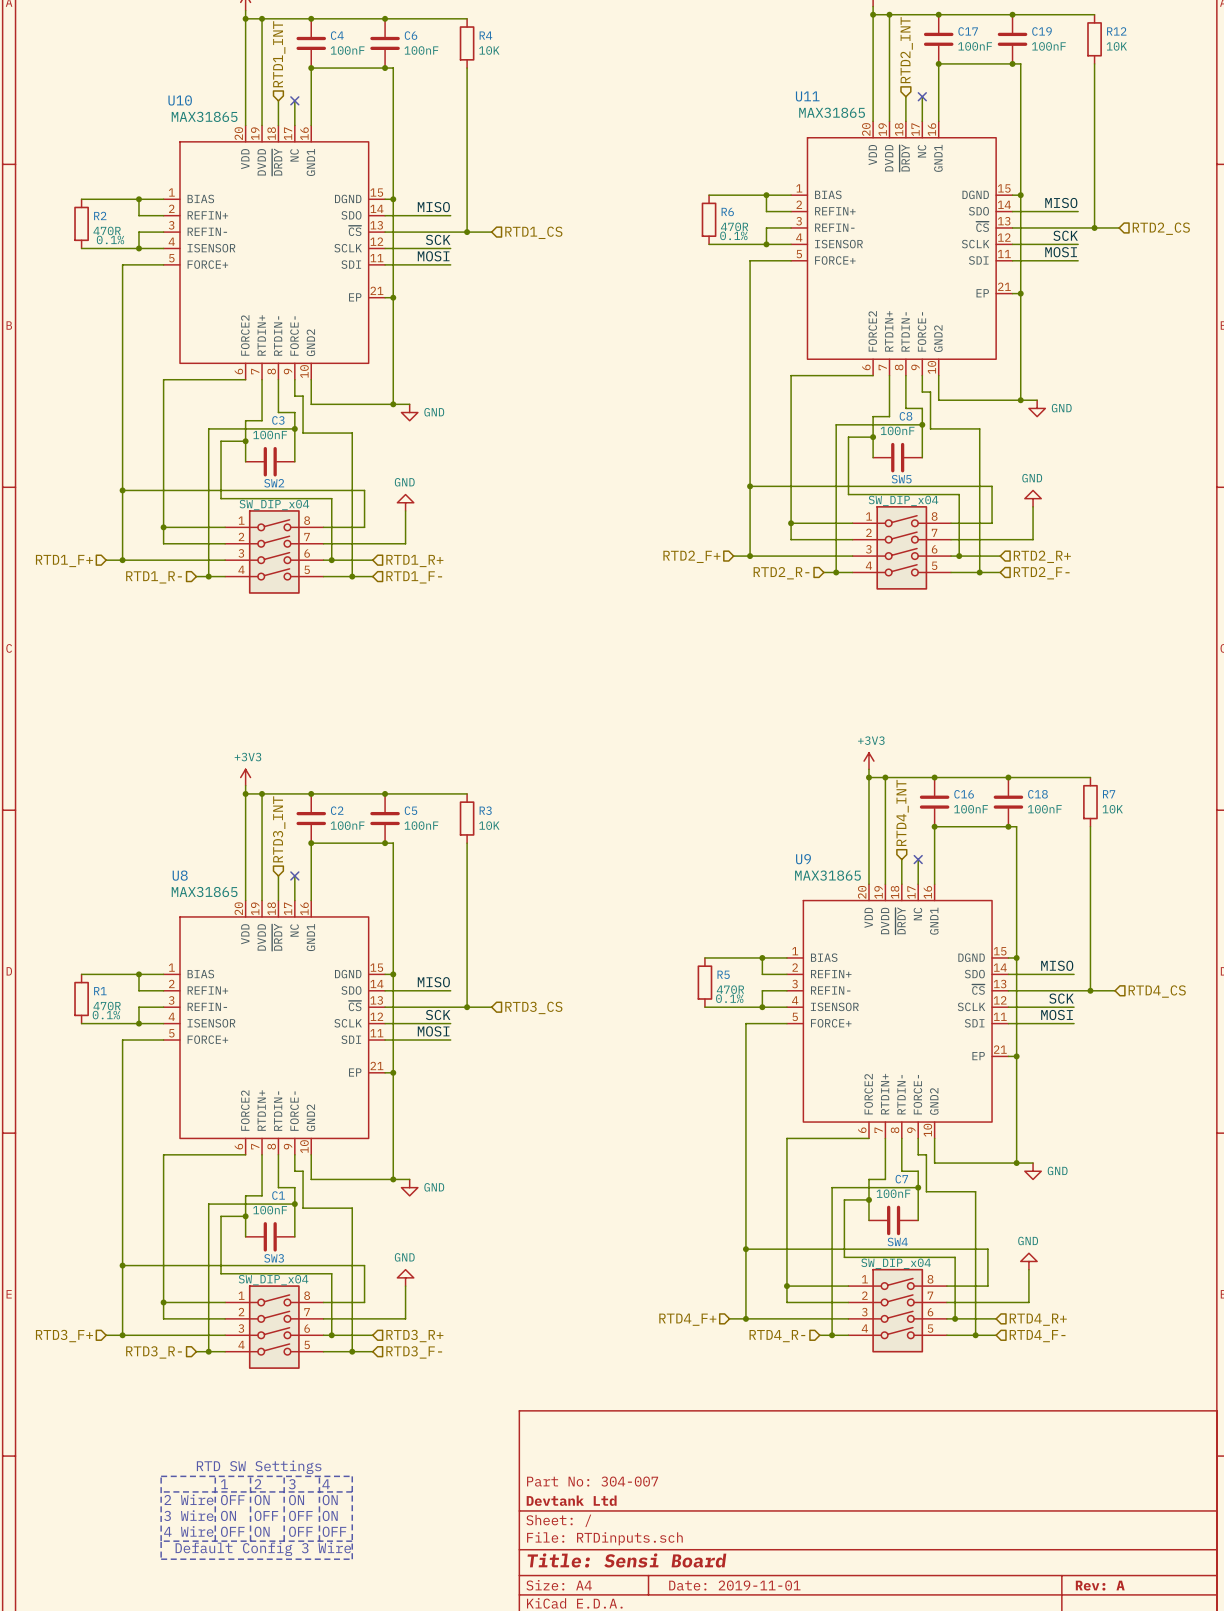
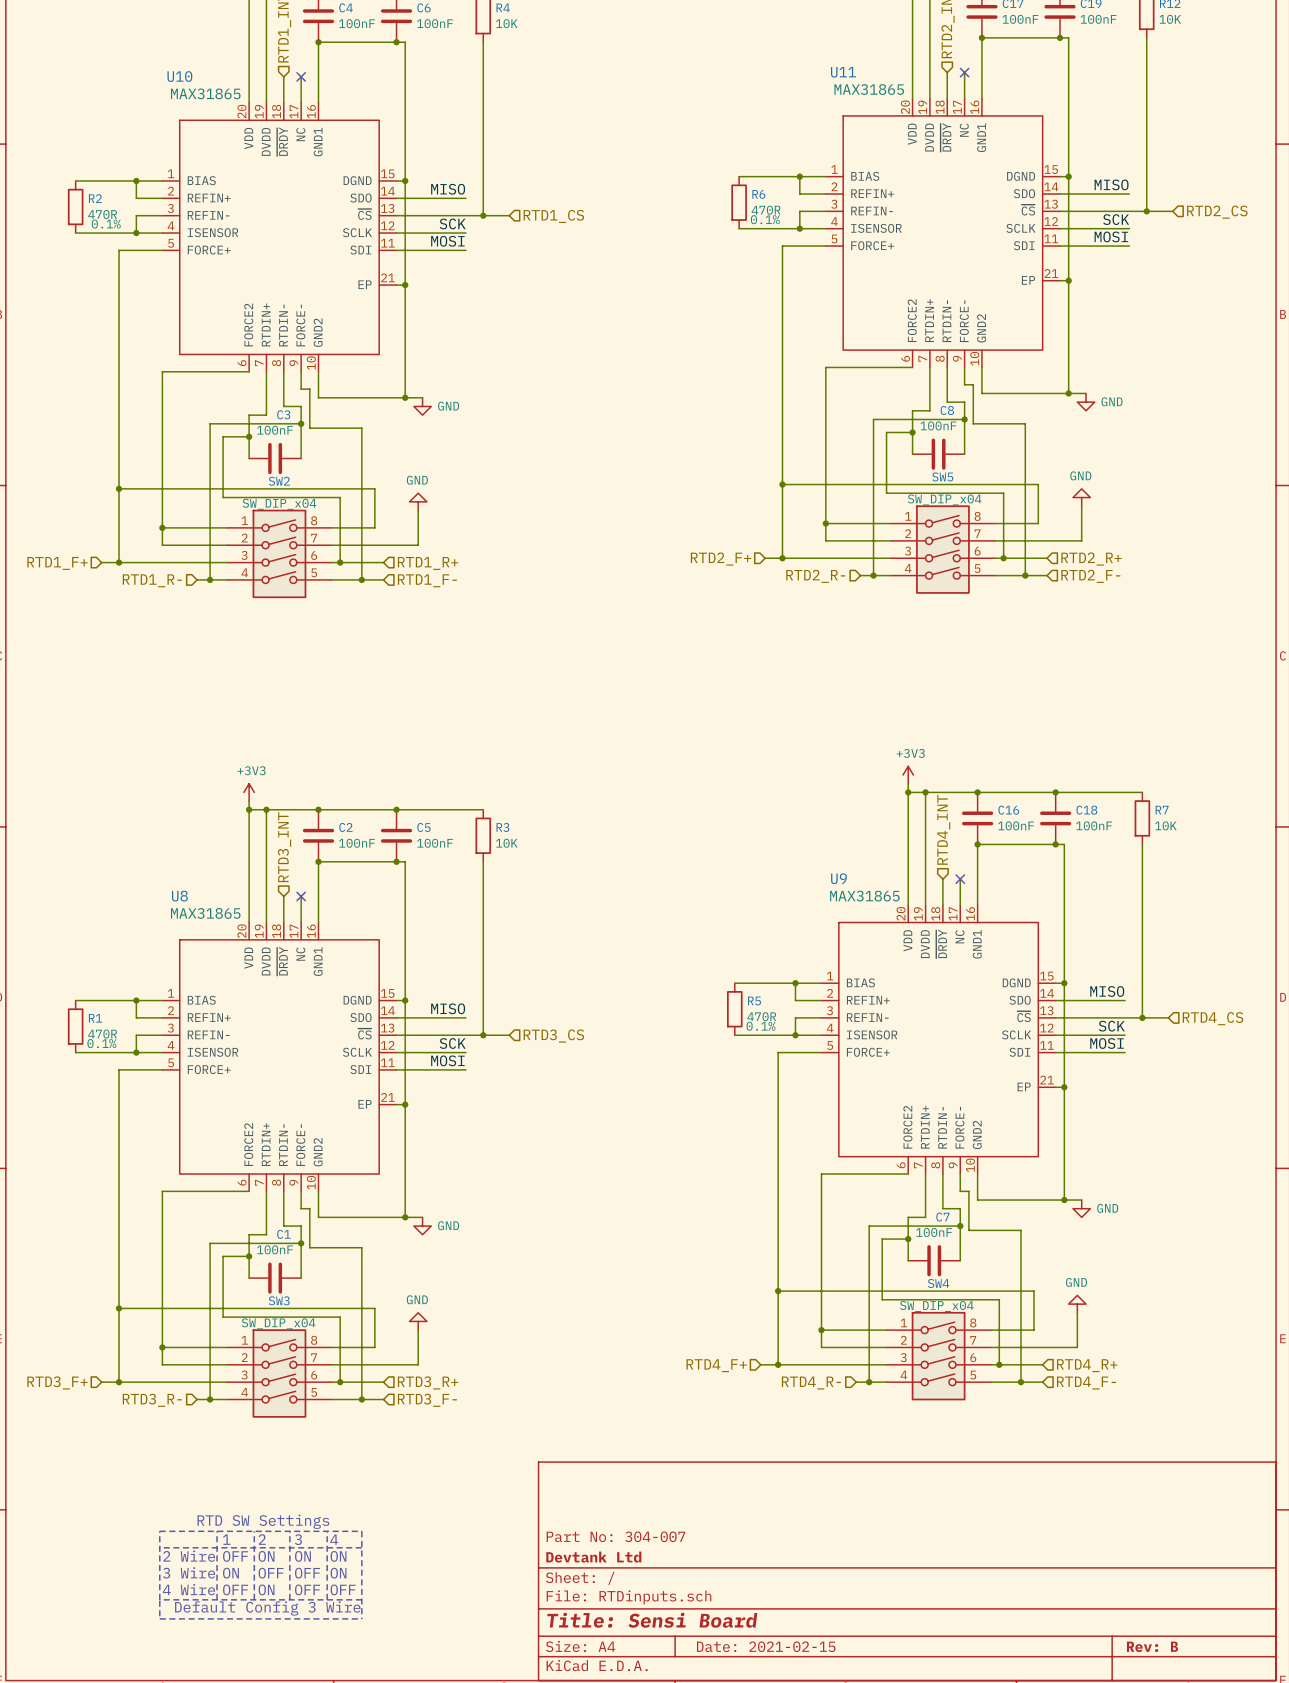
title block: Date: 2019-11-01 (734, 1585) -> Date: 2021-02-15 (766, 1646)
title block: Rev: A (1100, 1585) -> Rev: B (1152, 1646)

